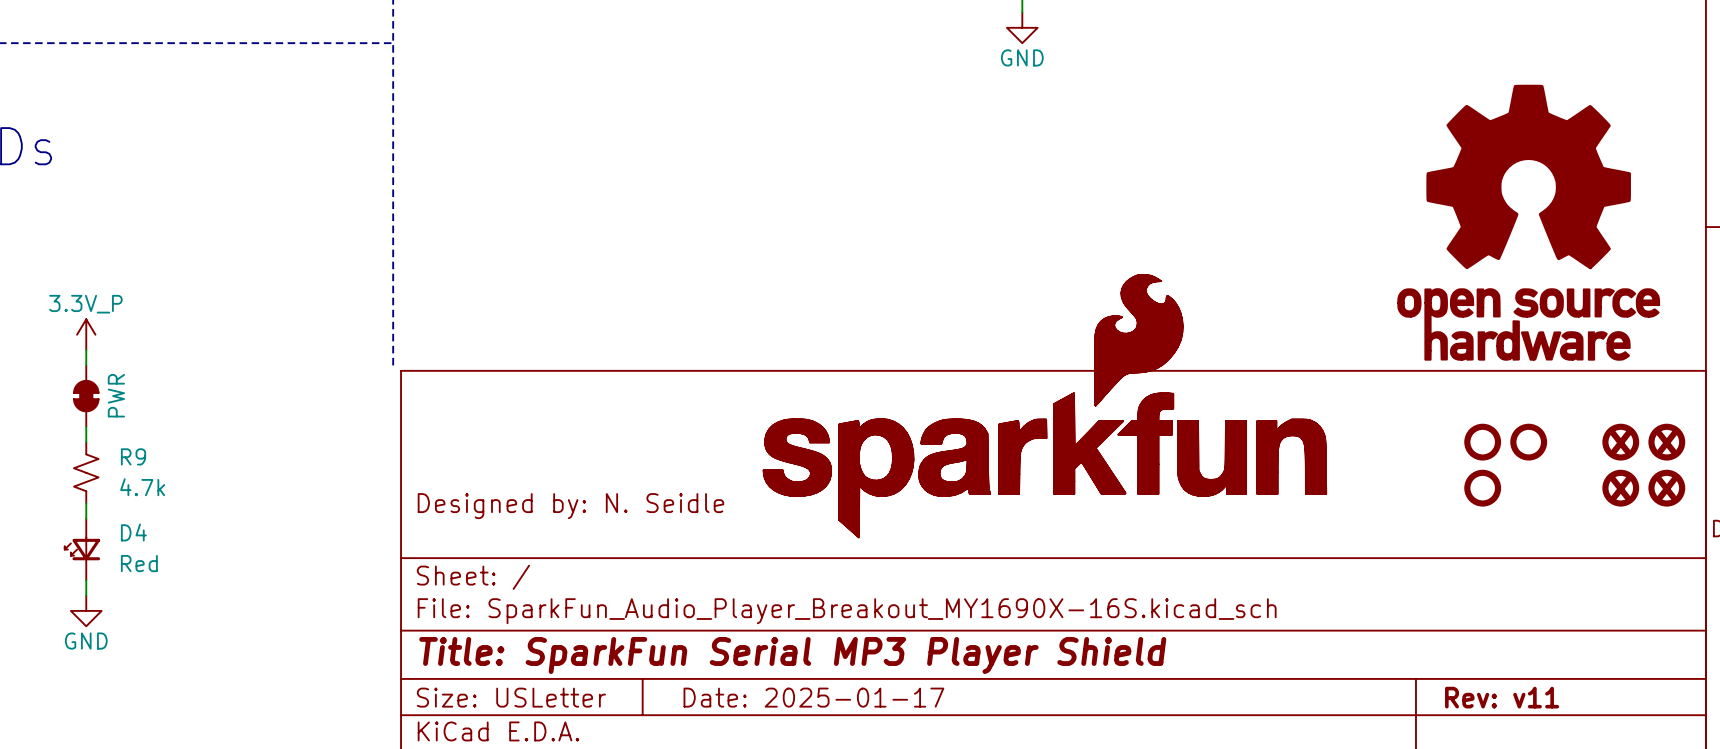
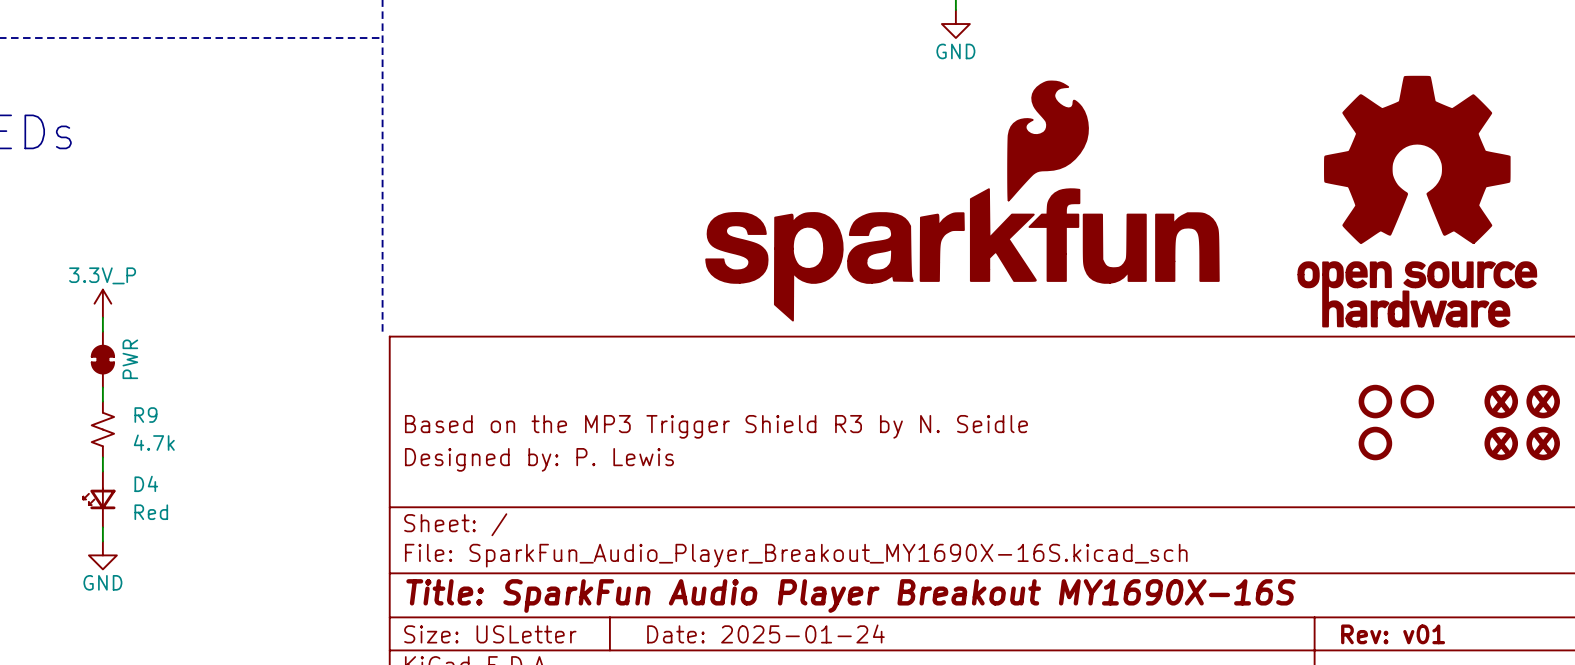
part position: (1044, 406) -> (962, 201)
title block: none -> Based on the MP3 Trigger Shield R3 by N. Seidle (716, 426)
title block: Designed by: N. Seidle (570, 506) -> Designed by: P. Lewis (539, 459)
title block: Title: SparkFun Serial MP3 Player Shield (792, 655) -> Title: SparkFun Audio Player Breakout MY1690X-16S (850, 596)
title block: Date: 2025-01-17 (813, 697) -> Date: 2025-01-24 (765, 633)
title block: Rev: v11 (1502, 697) -> Rev: v01 (1393, 634)

